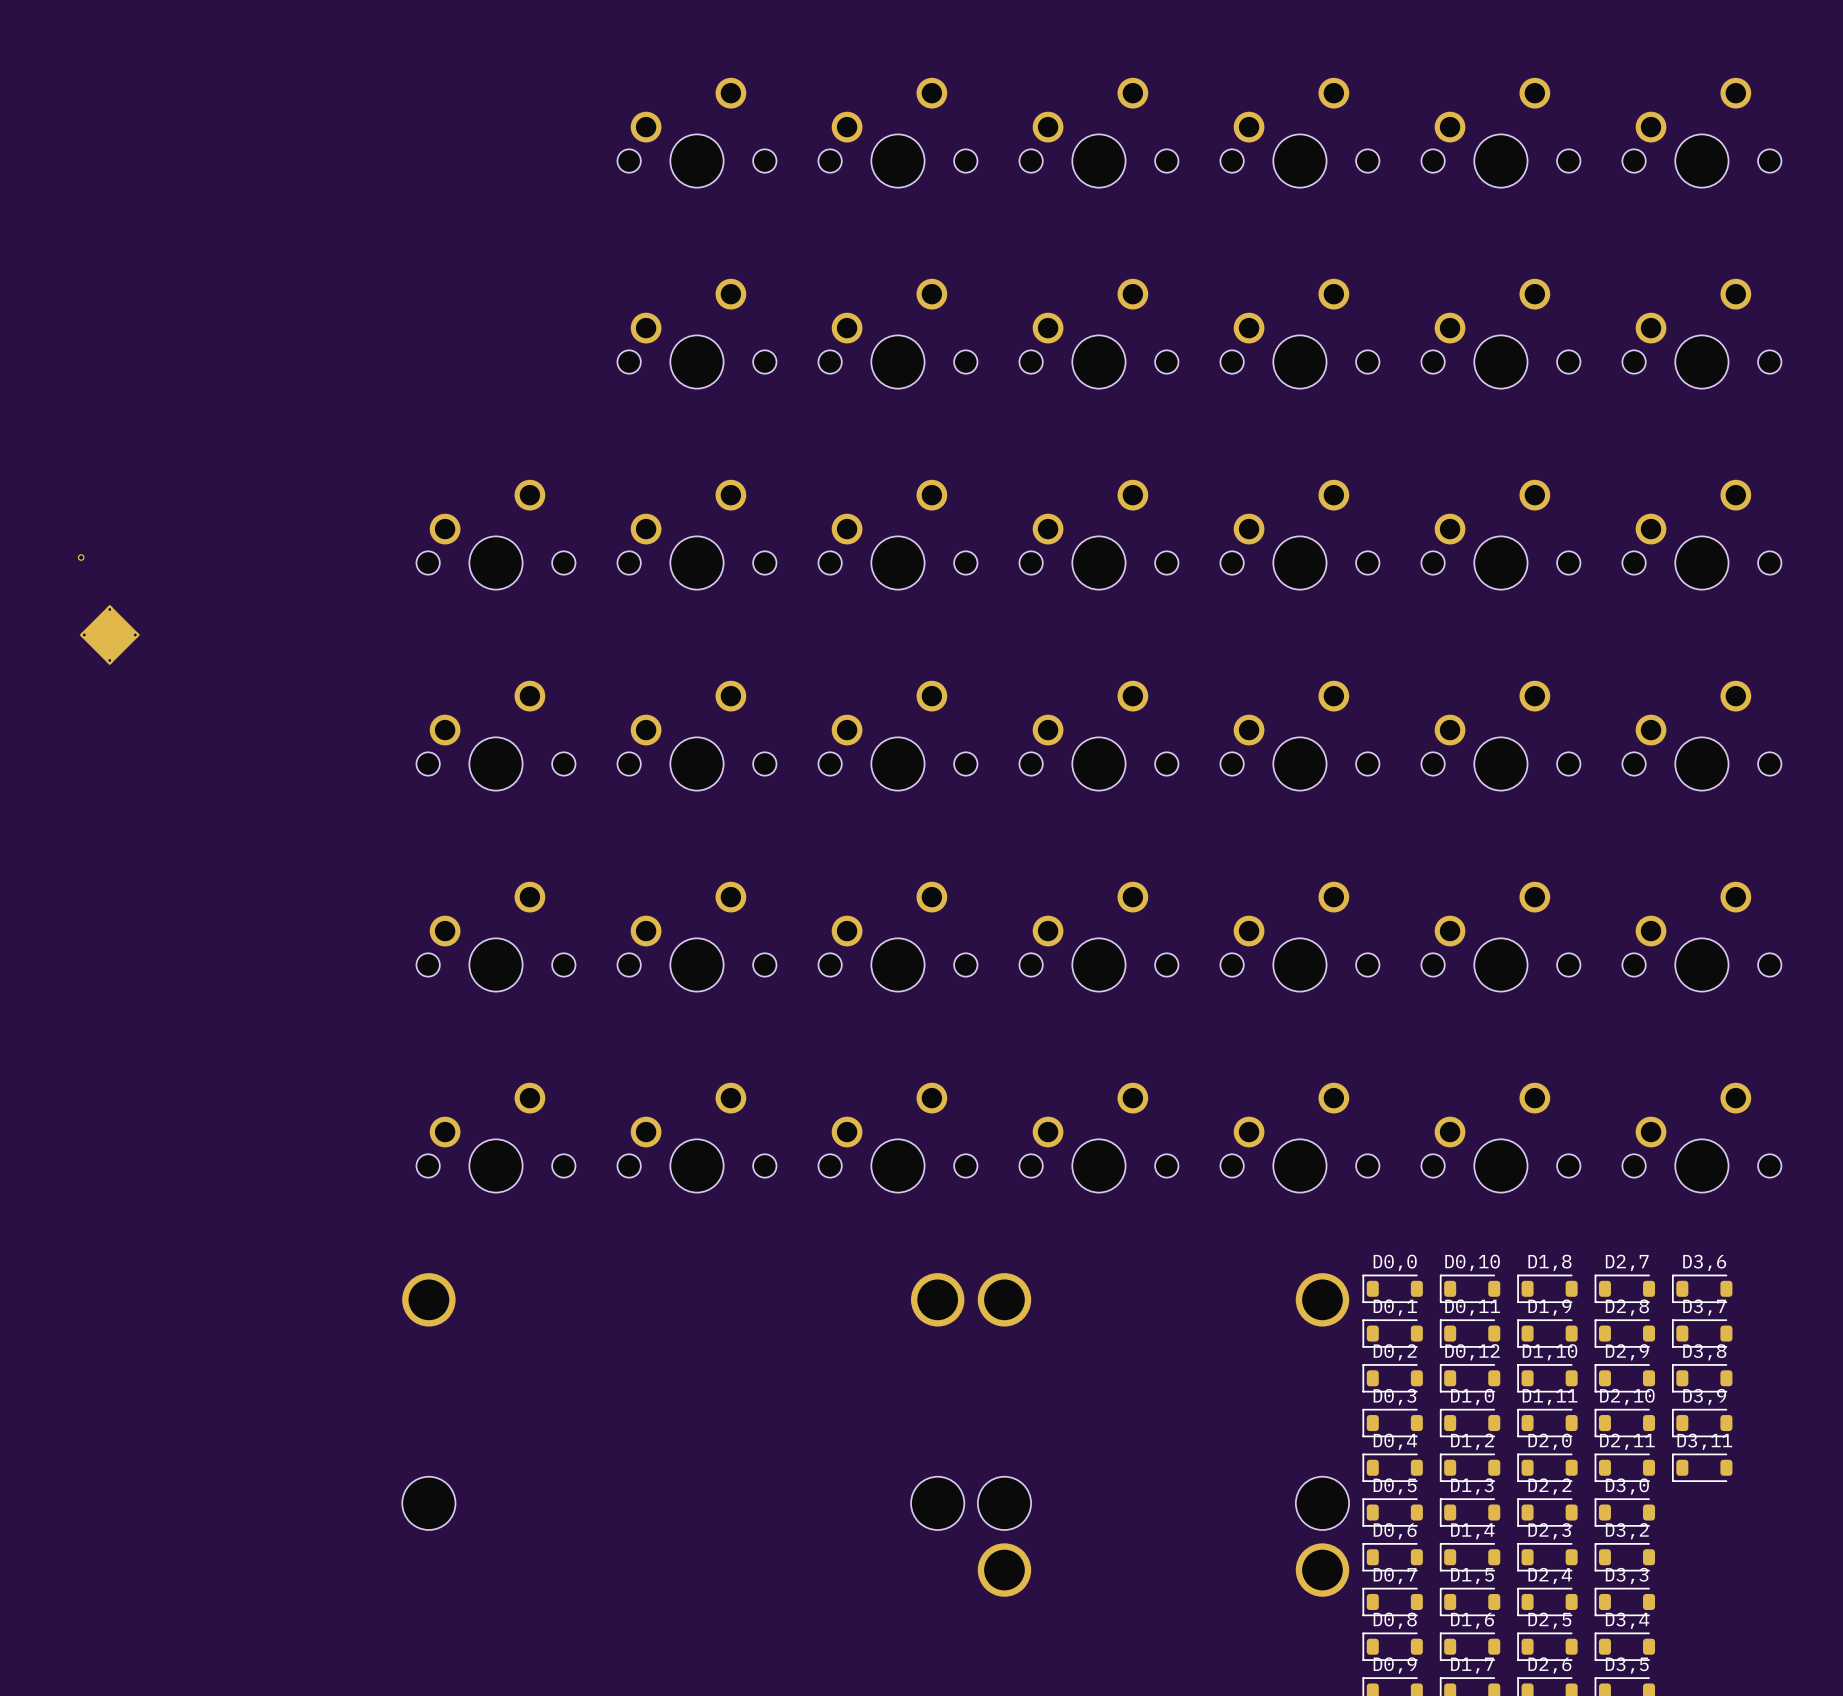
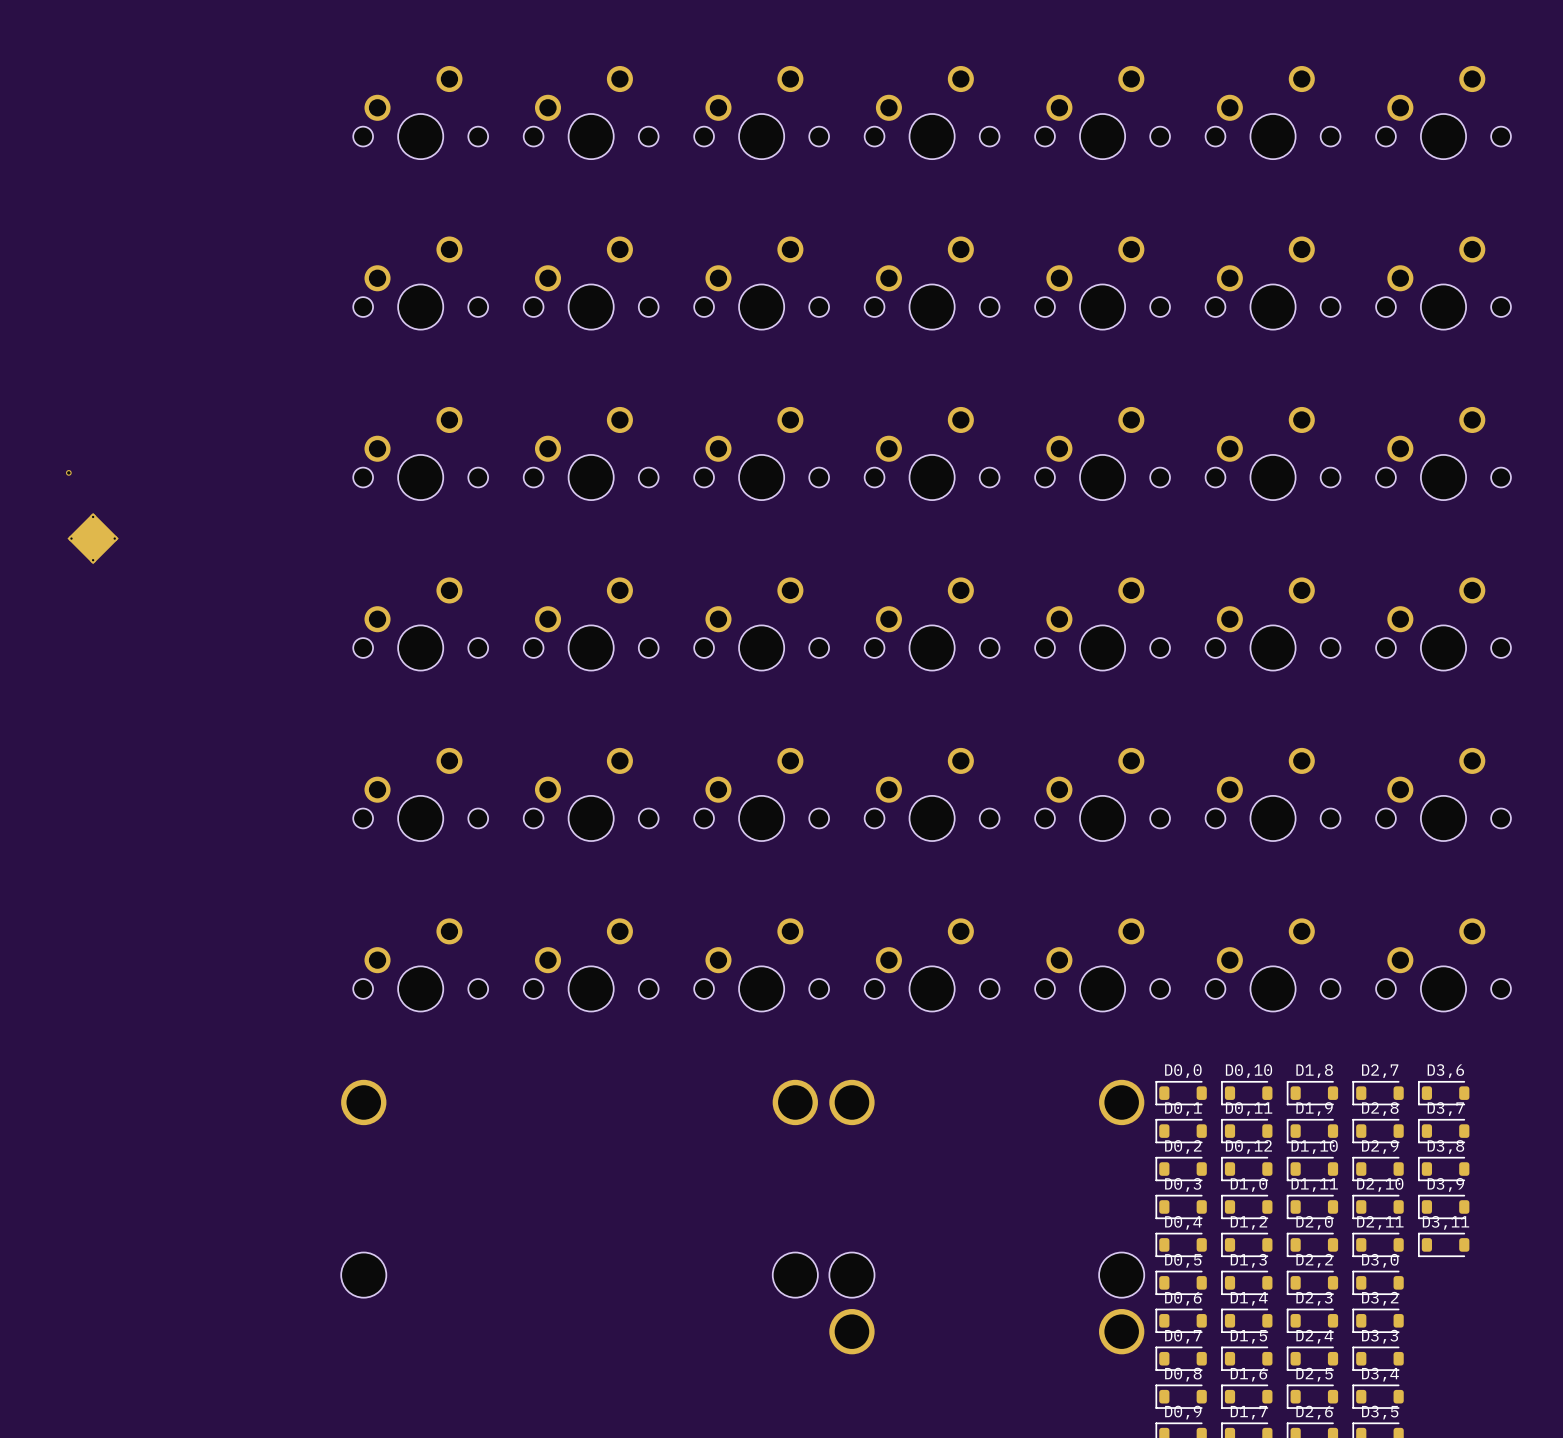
part: none -> (420, 112)
part: none -> (420, 283)

